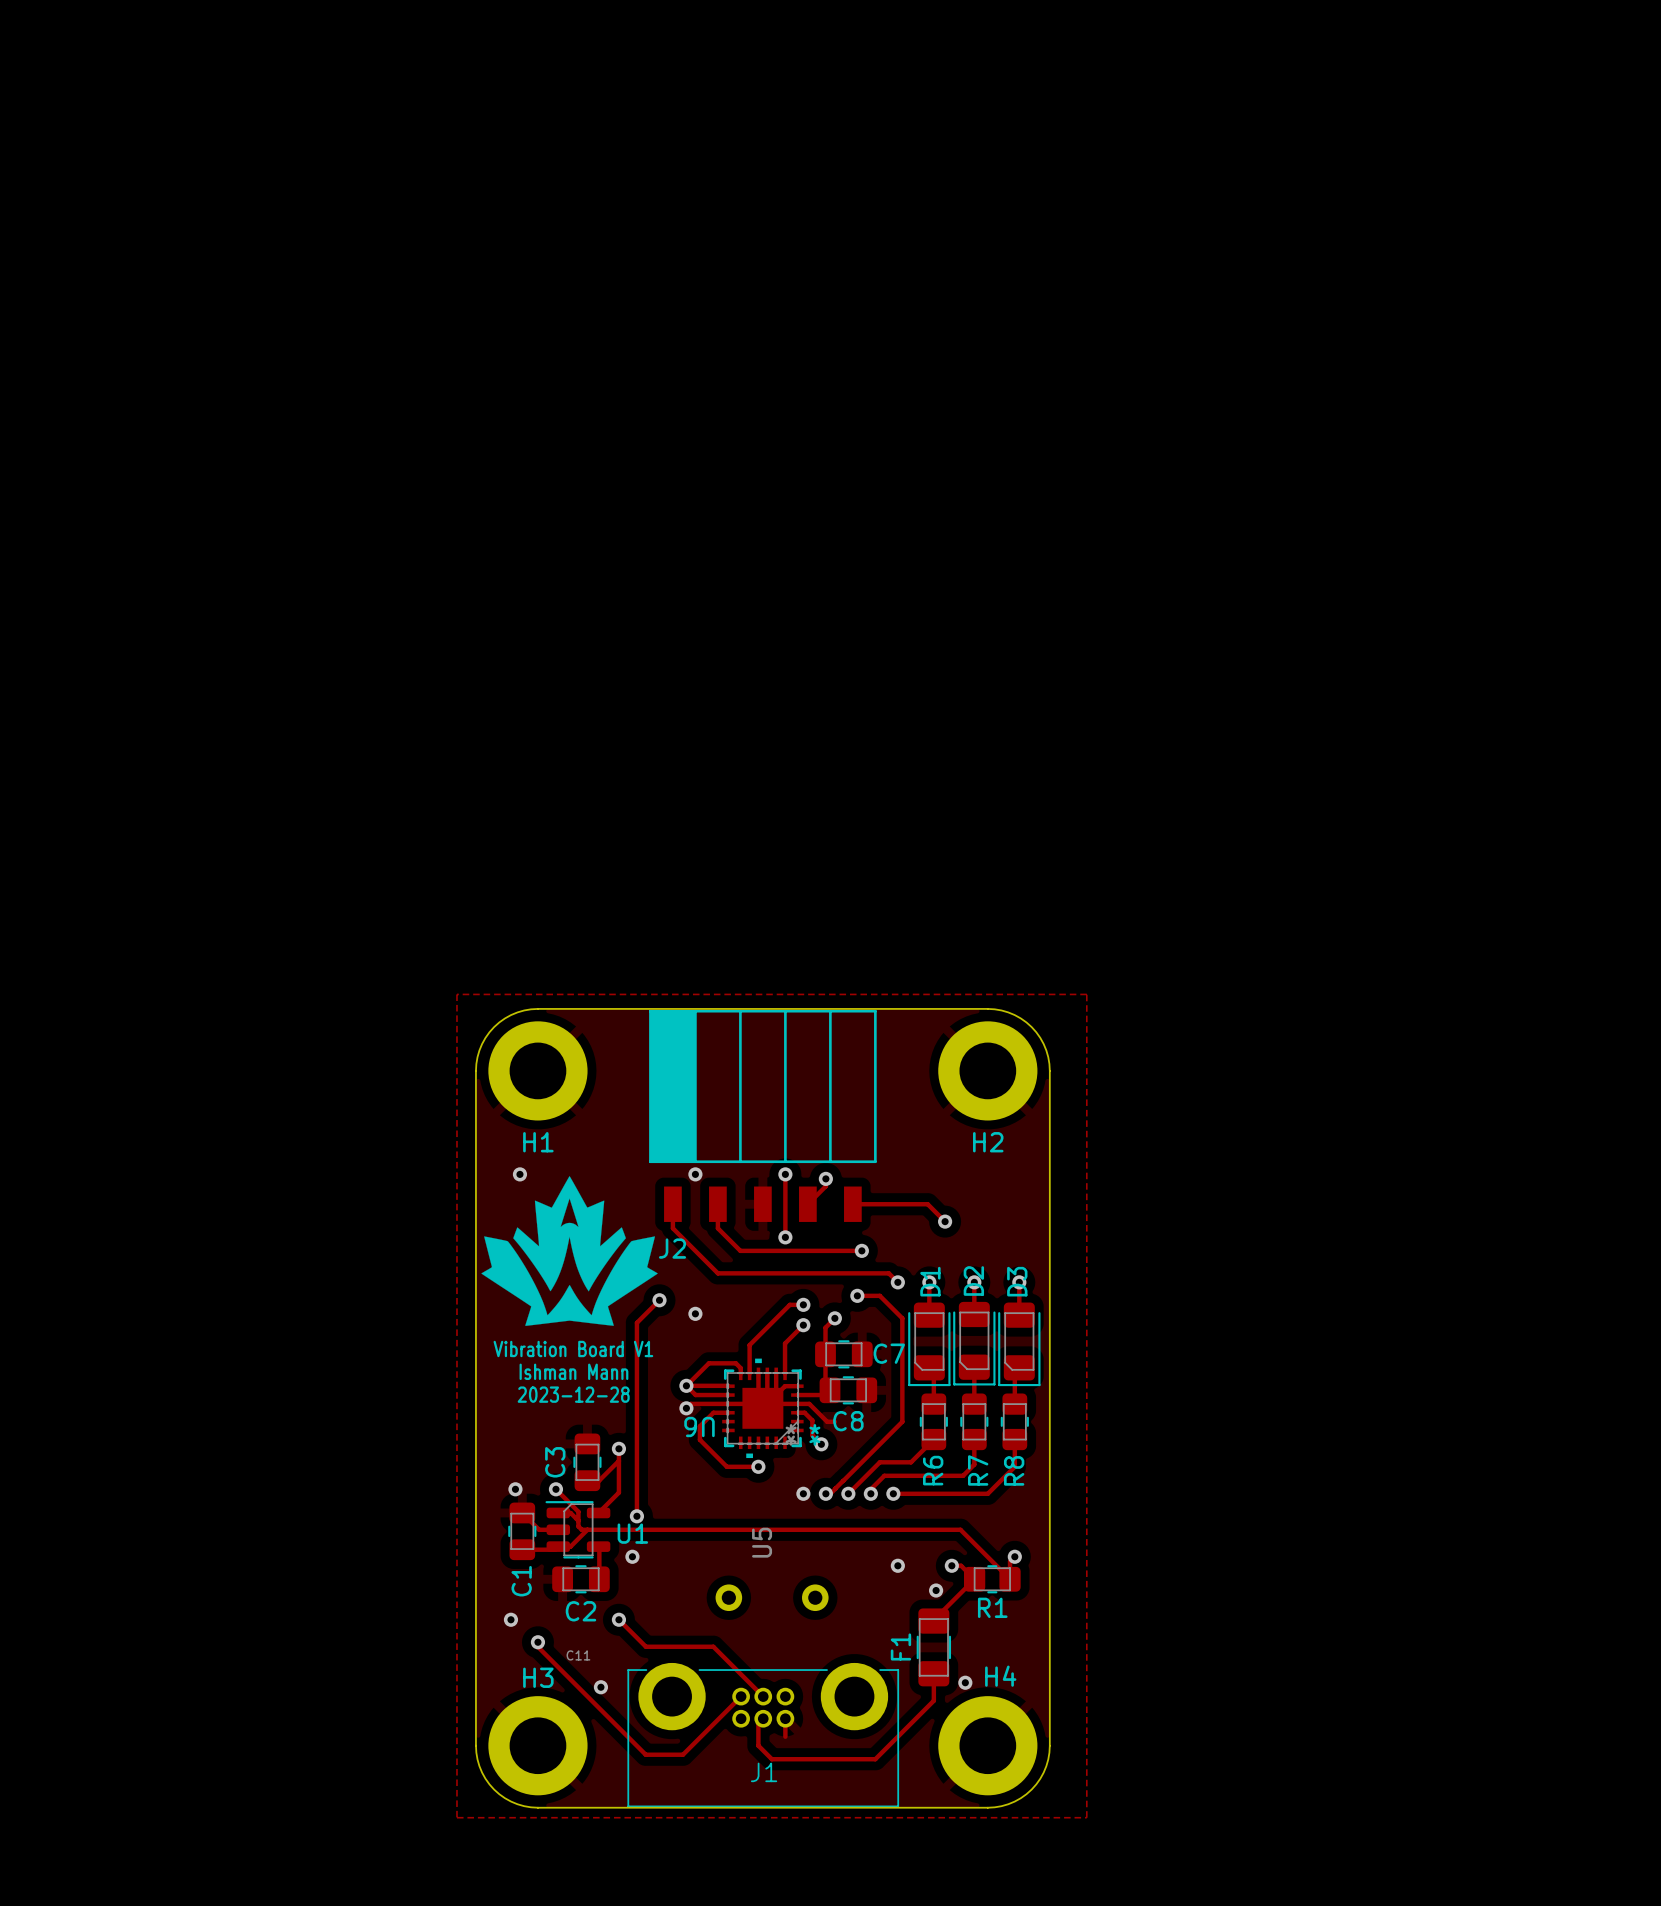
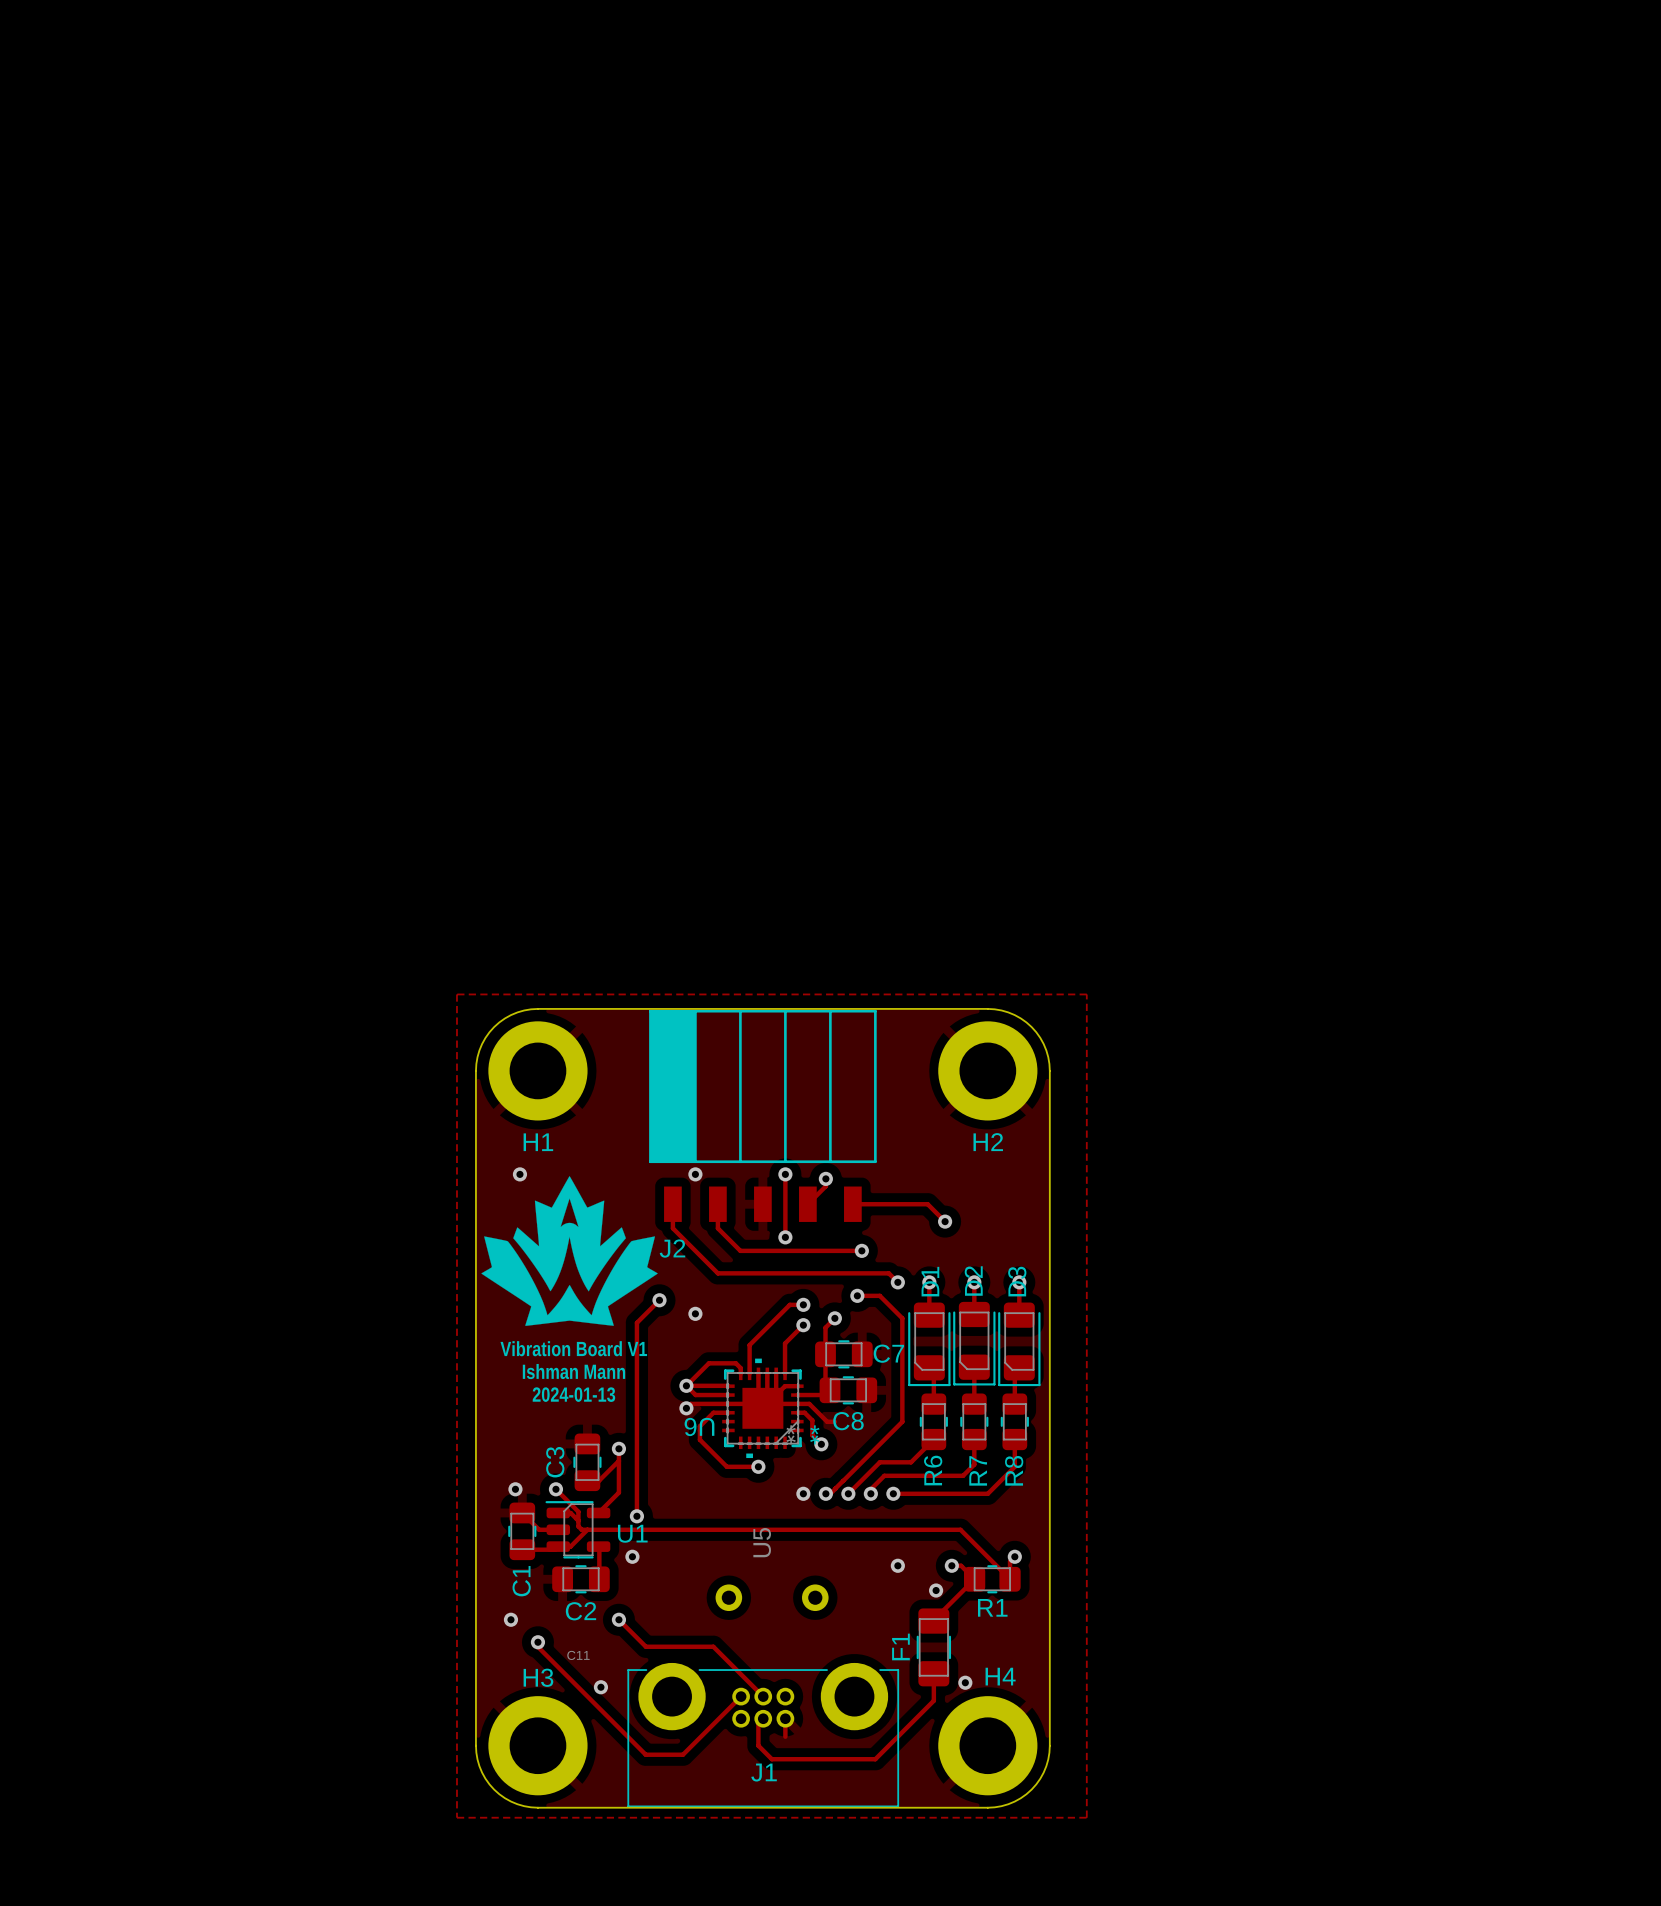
text: 2023-12-28 (573, 1394) -> 2024-01-13 (573, 1394)

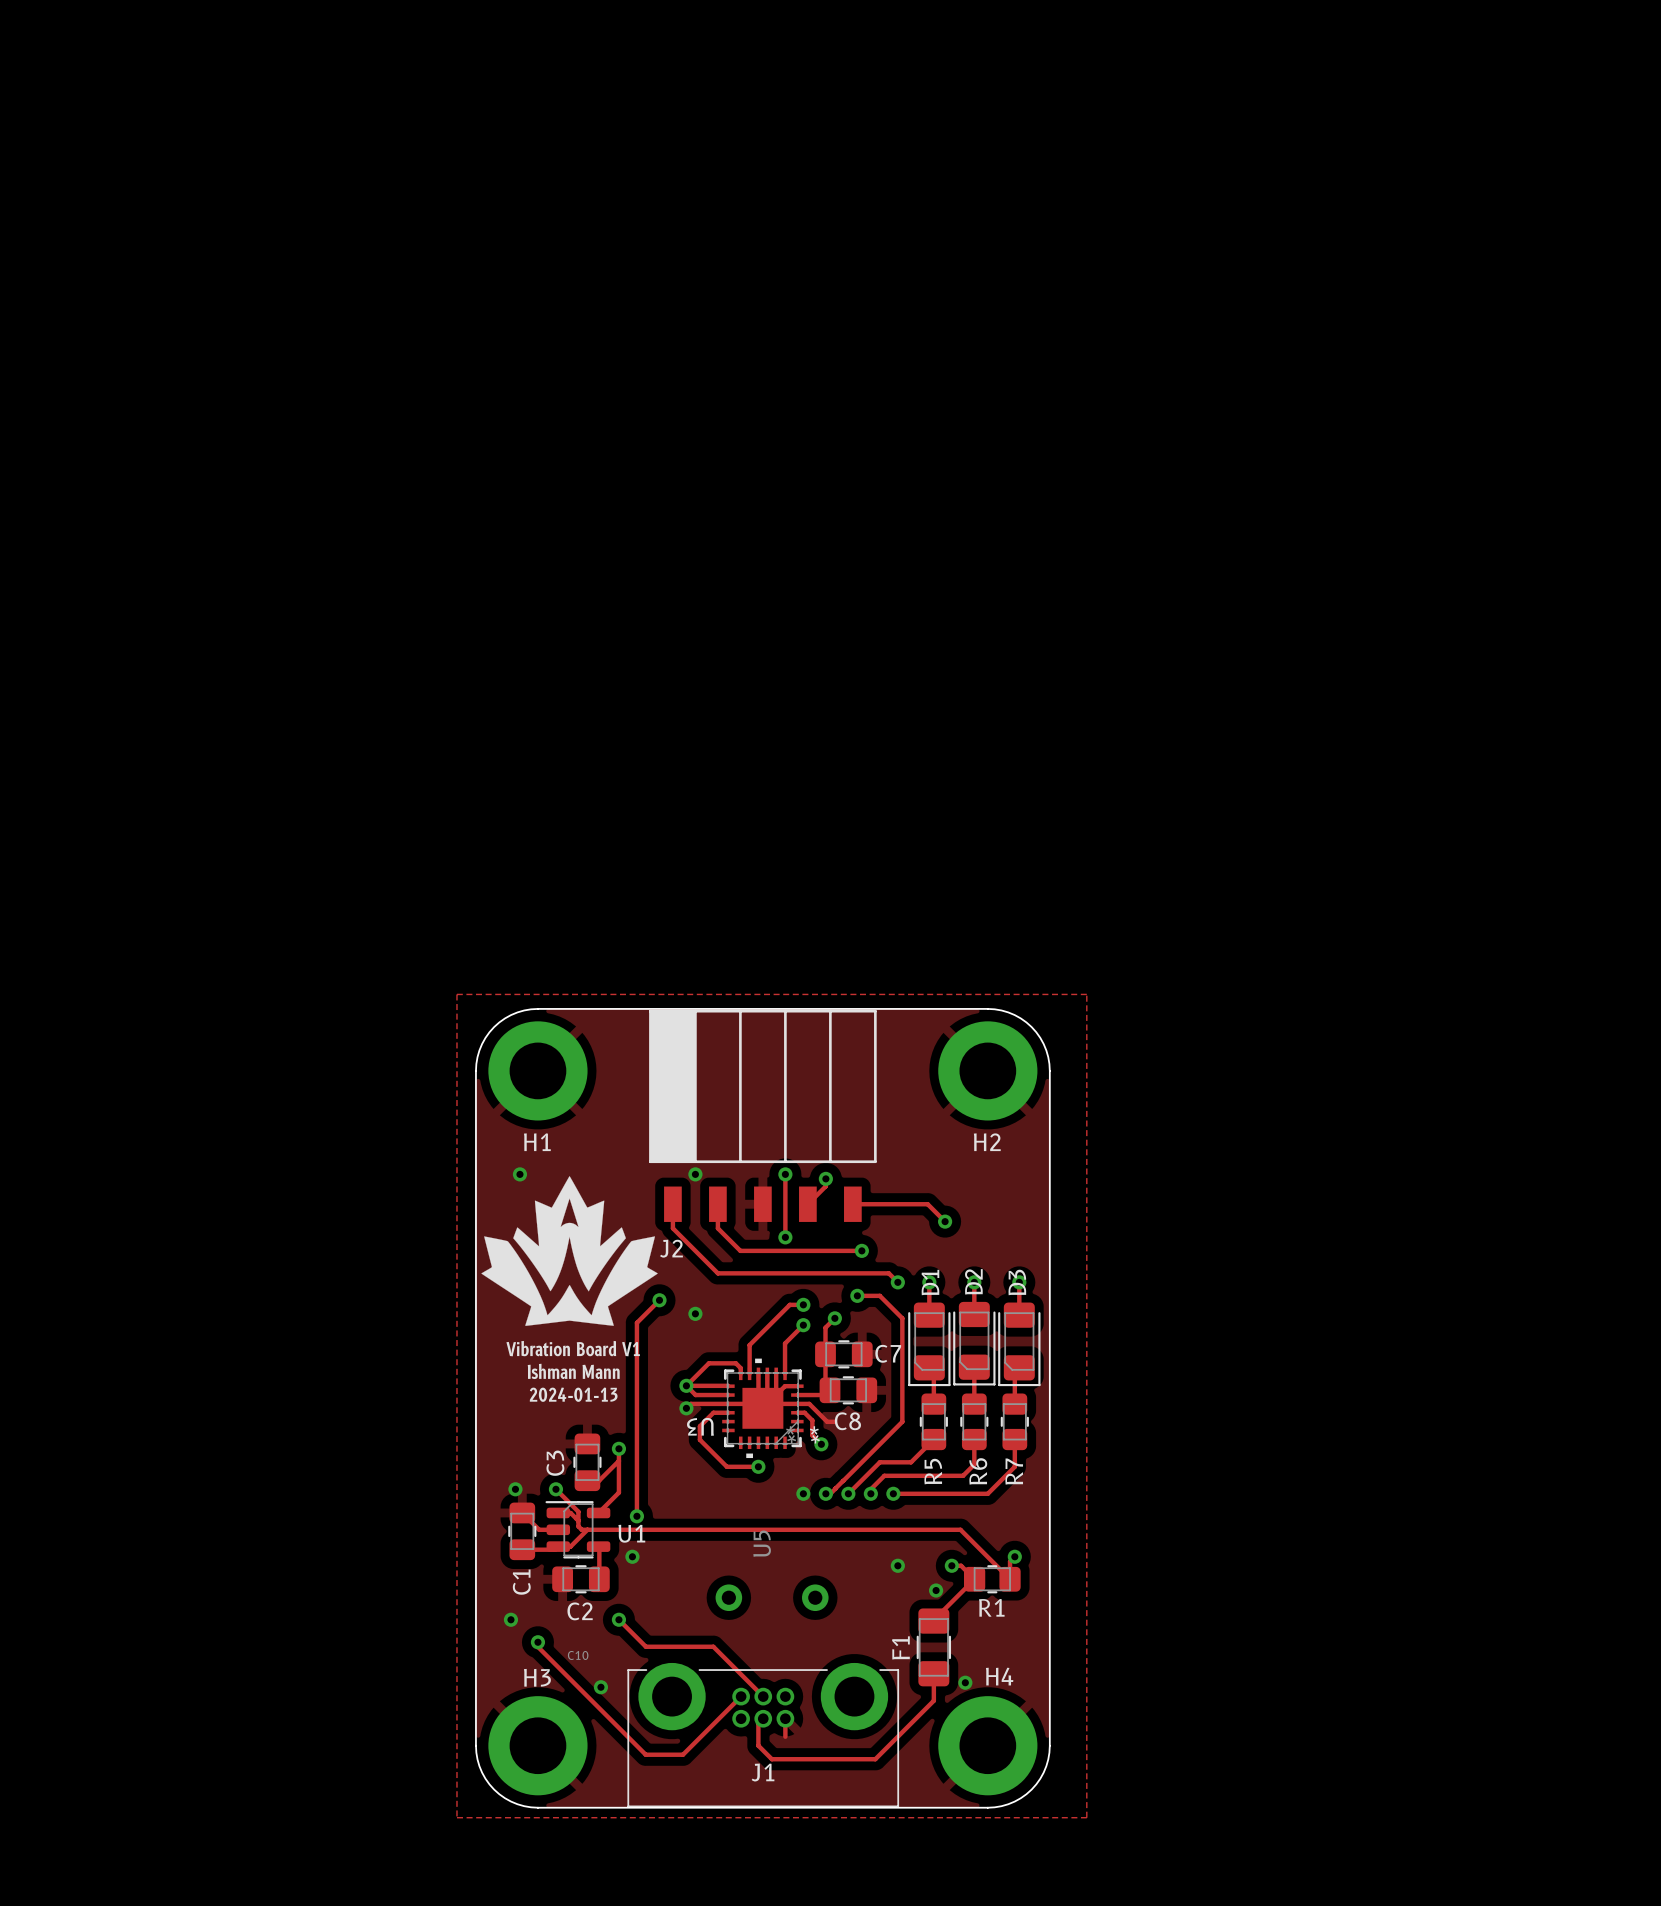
U6 name: U6 (699, 1426) -> U3 (700, 1426)
R6 name: R6 (933, 1470) -> R5 (933, 1471)
R7 name: R7 (978, 1470) -> R6 (978, 1471)
R8 name: R8 (1014, 1470) -> R7 (1014, 1471)
C11 name: C11 (578, 1655) -> C10 (578, 1655)

